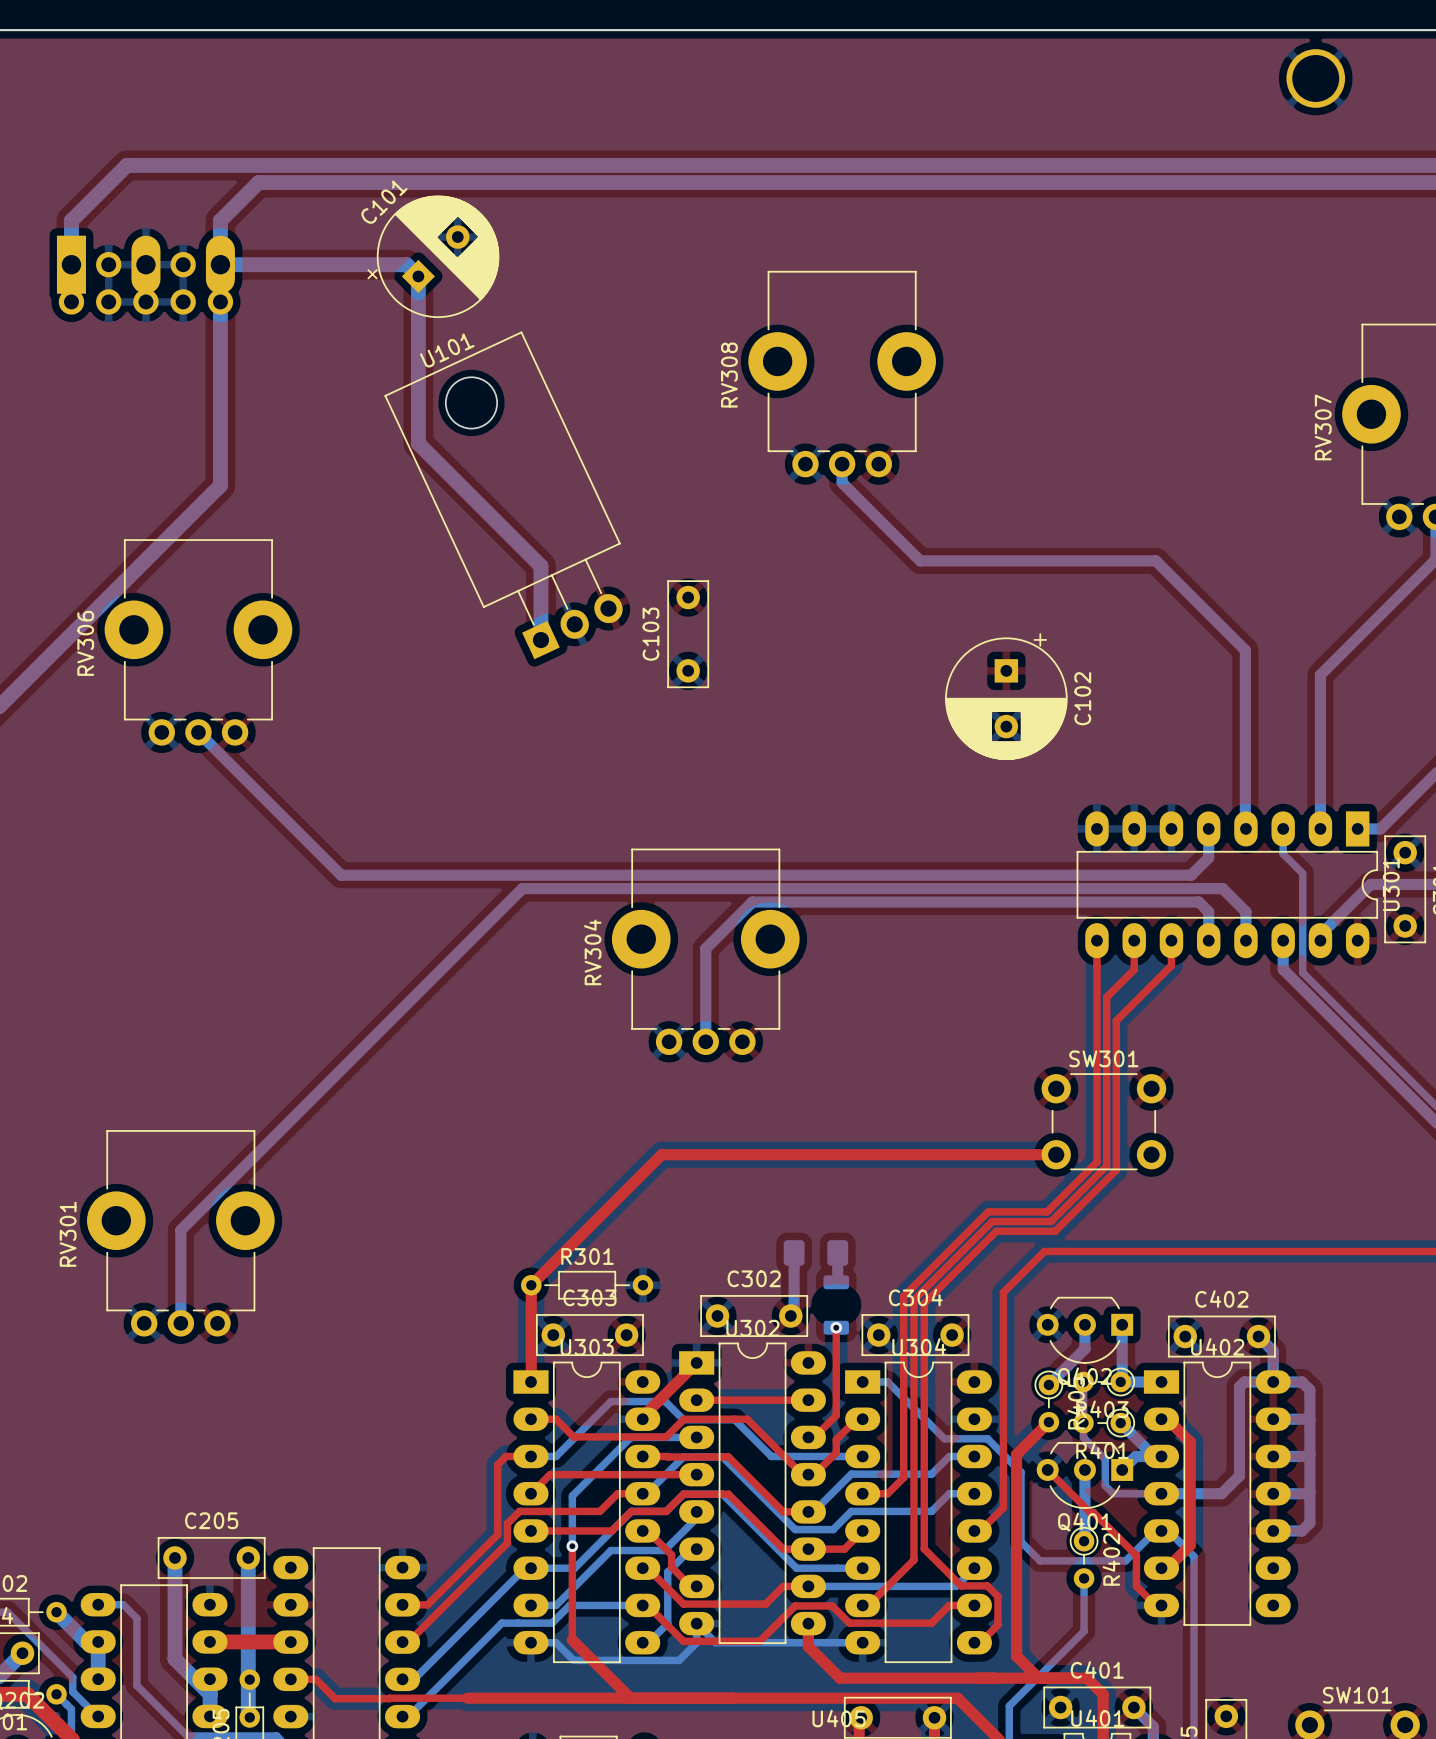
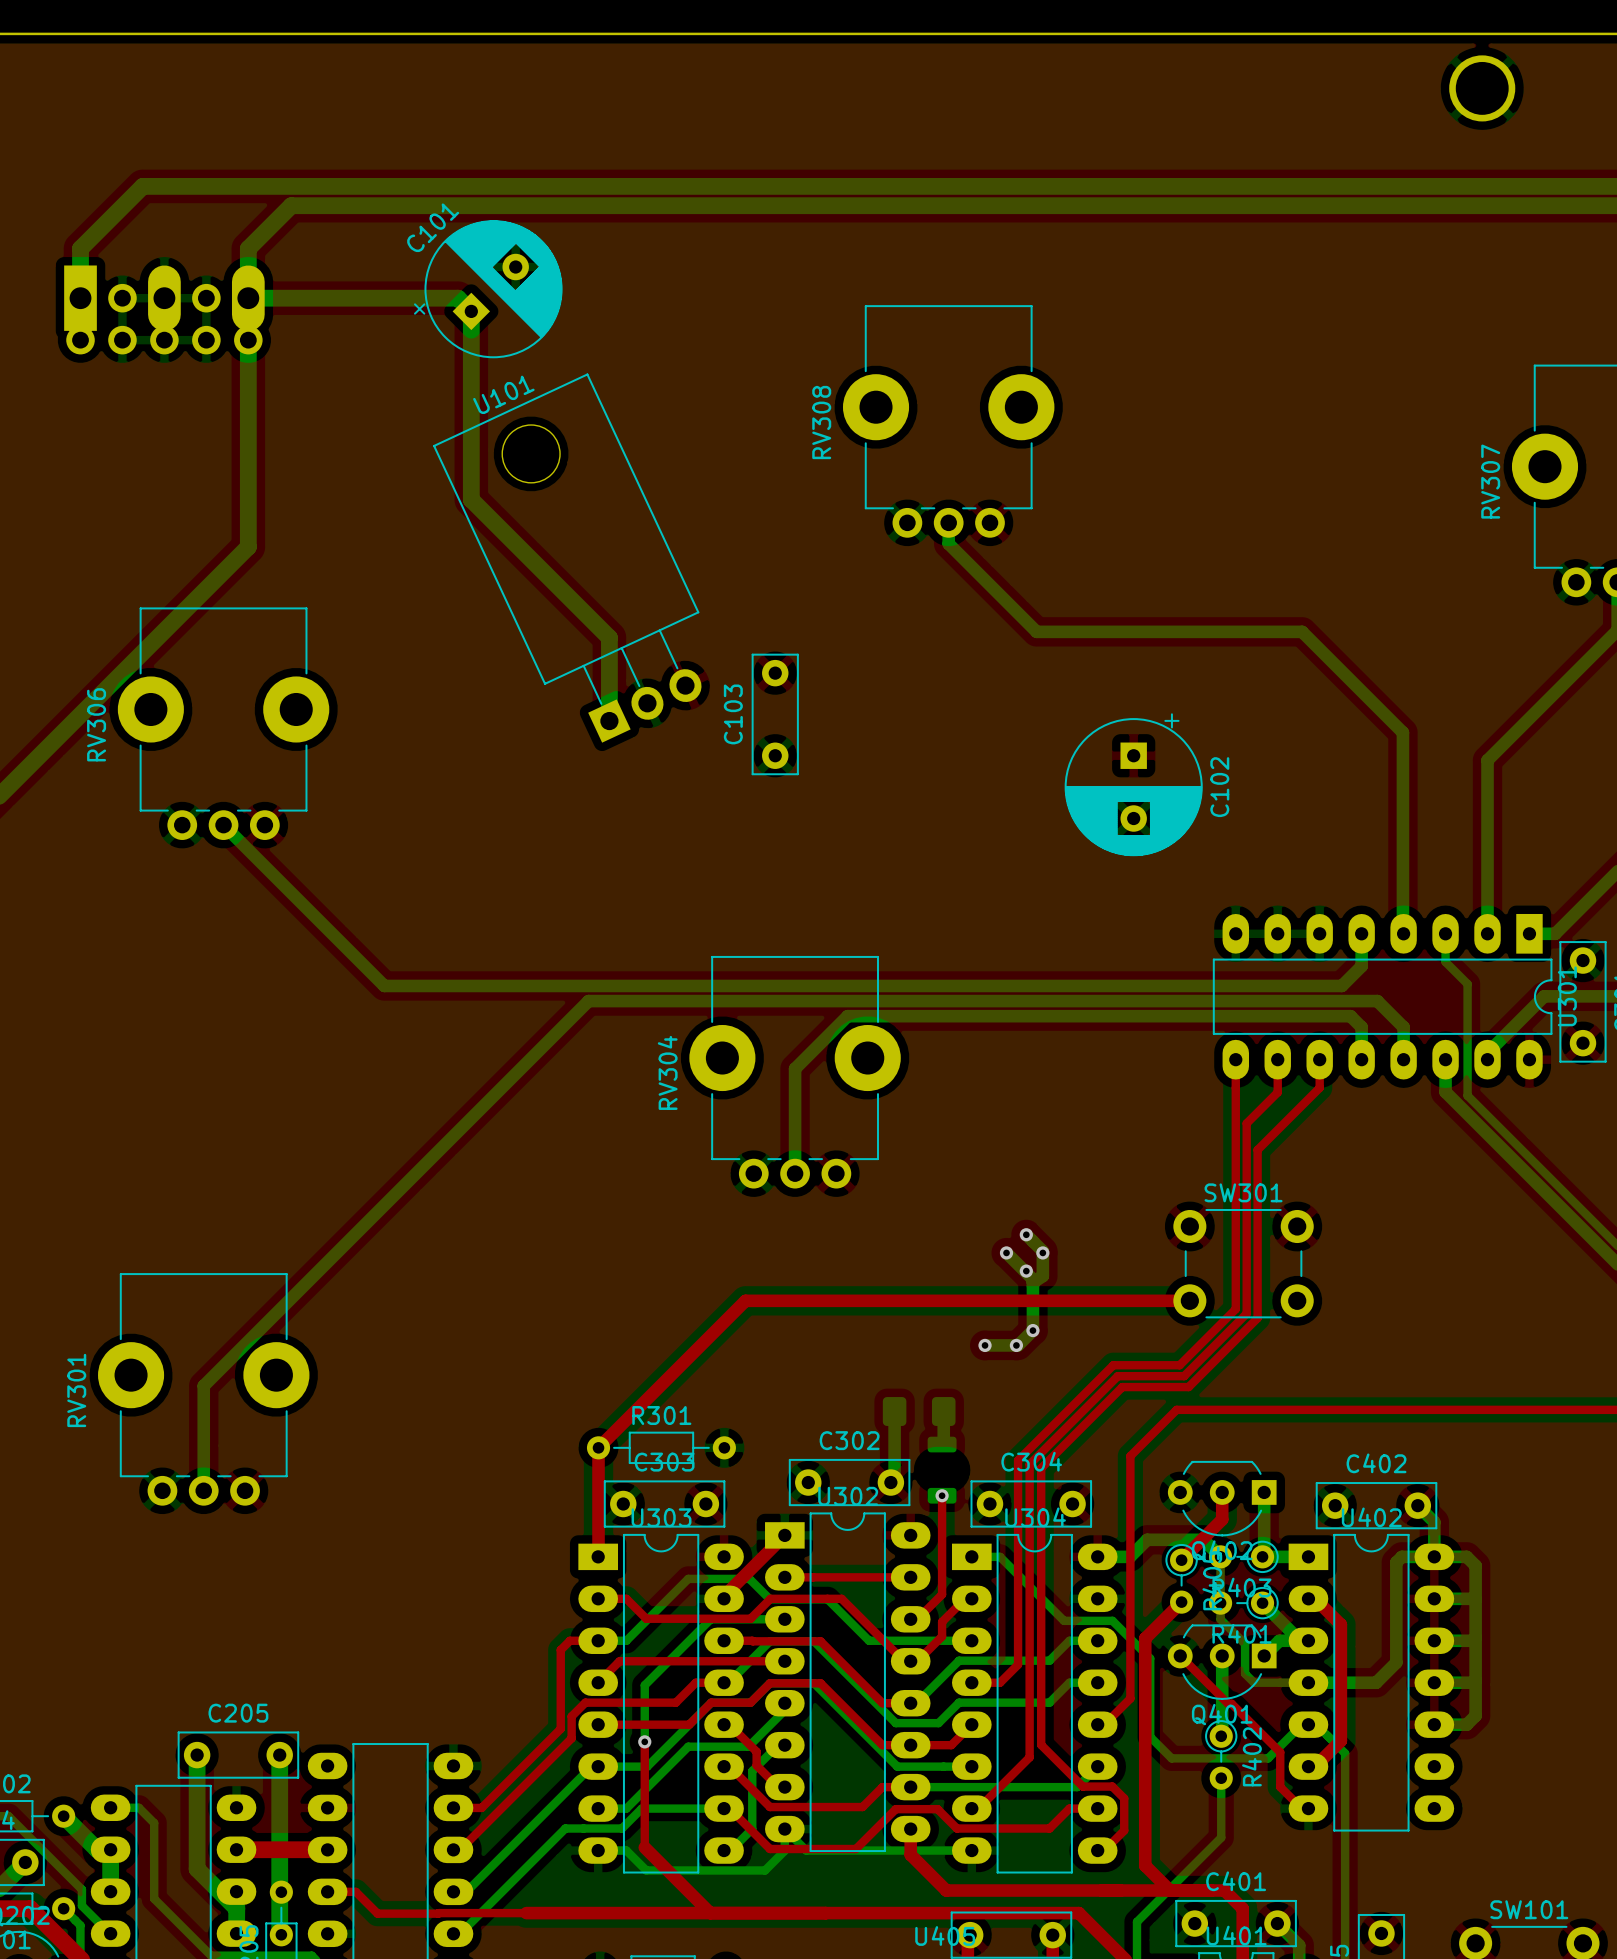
bottom track: none -> (1026, 1234) (1042, 1251) (1042, 1276) (1032, 1282)
via: none -> (1026, 1234)
bottom track: none -> (1006, 1252) (1032, 1279) (1032, 1330) (1018, 1345) (985, 1345)
via: none -> (1006, 1252)
via: none -> (1042, 1252)
via: none -> (1026, 1271)
via: none -> (1032, 1330)
via: none -> (985, 1345)
via: none -> (1016, 1345)
bottom track: (1084, 1324) (1084, 1348) (1048, 1384) -> none
top track: none -> (1222, 1492) (1222, 1519) (1181, 1560)
bottom track: none -> (1097, 1556) (1130, 1556) (1147, 1539) (1203, 1539) (1220, 1556)

